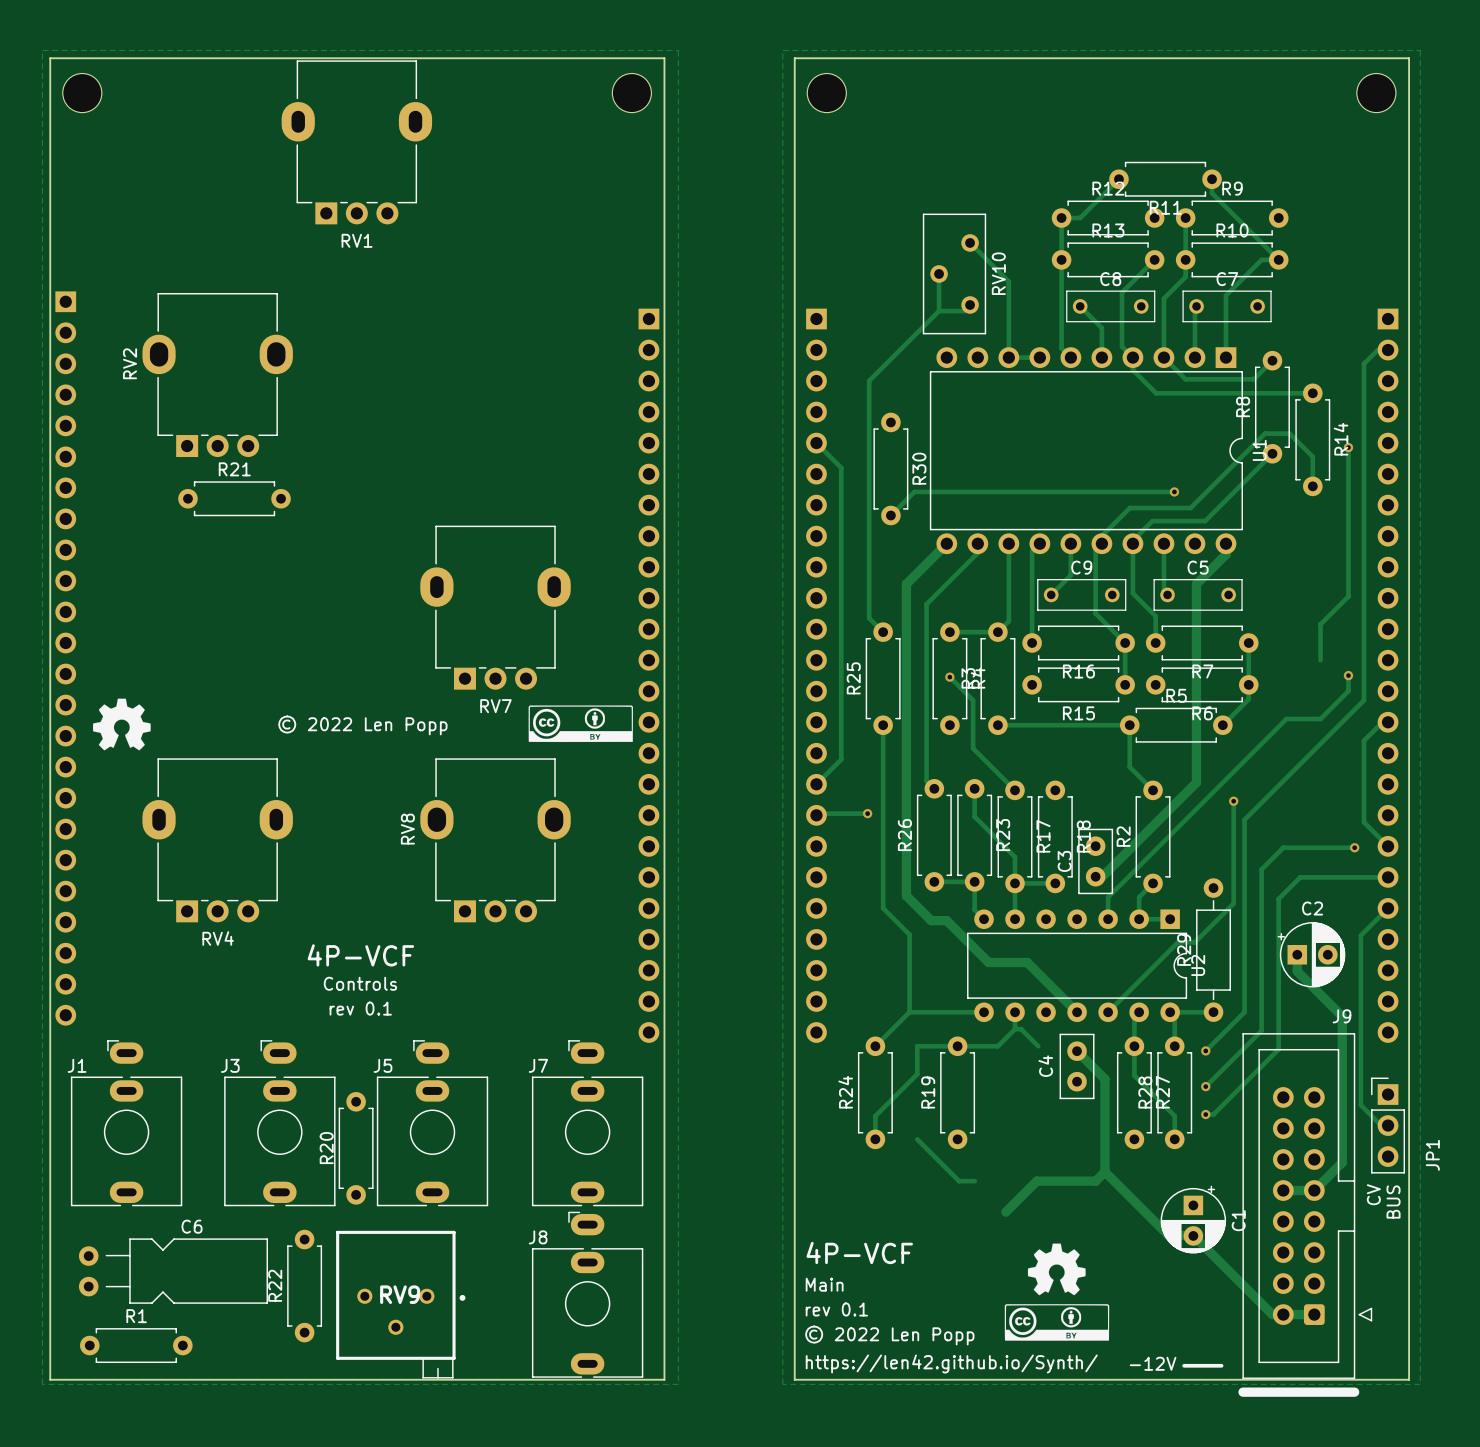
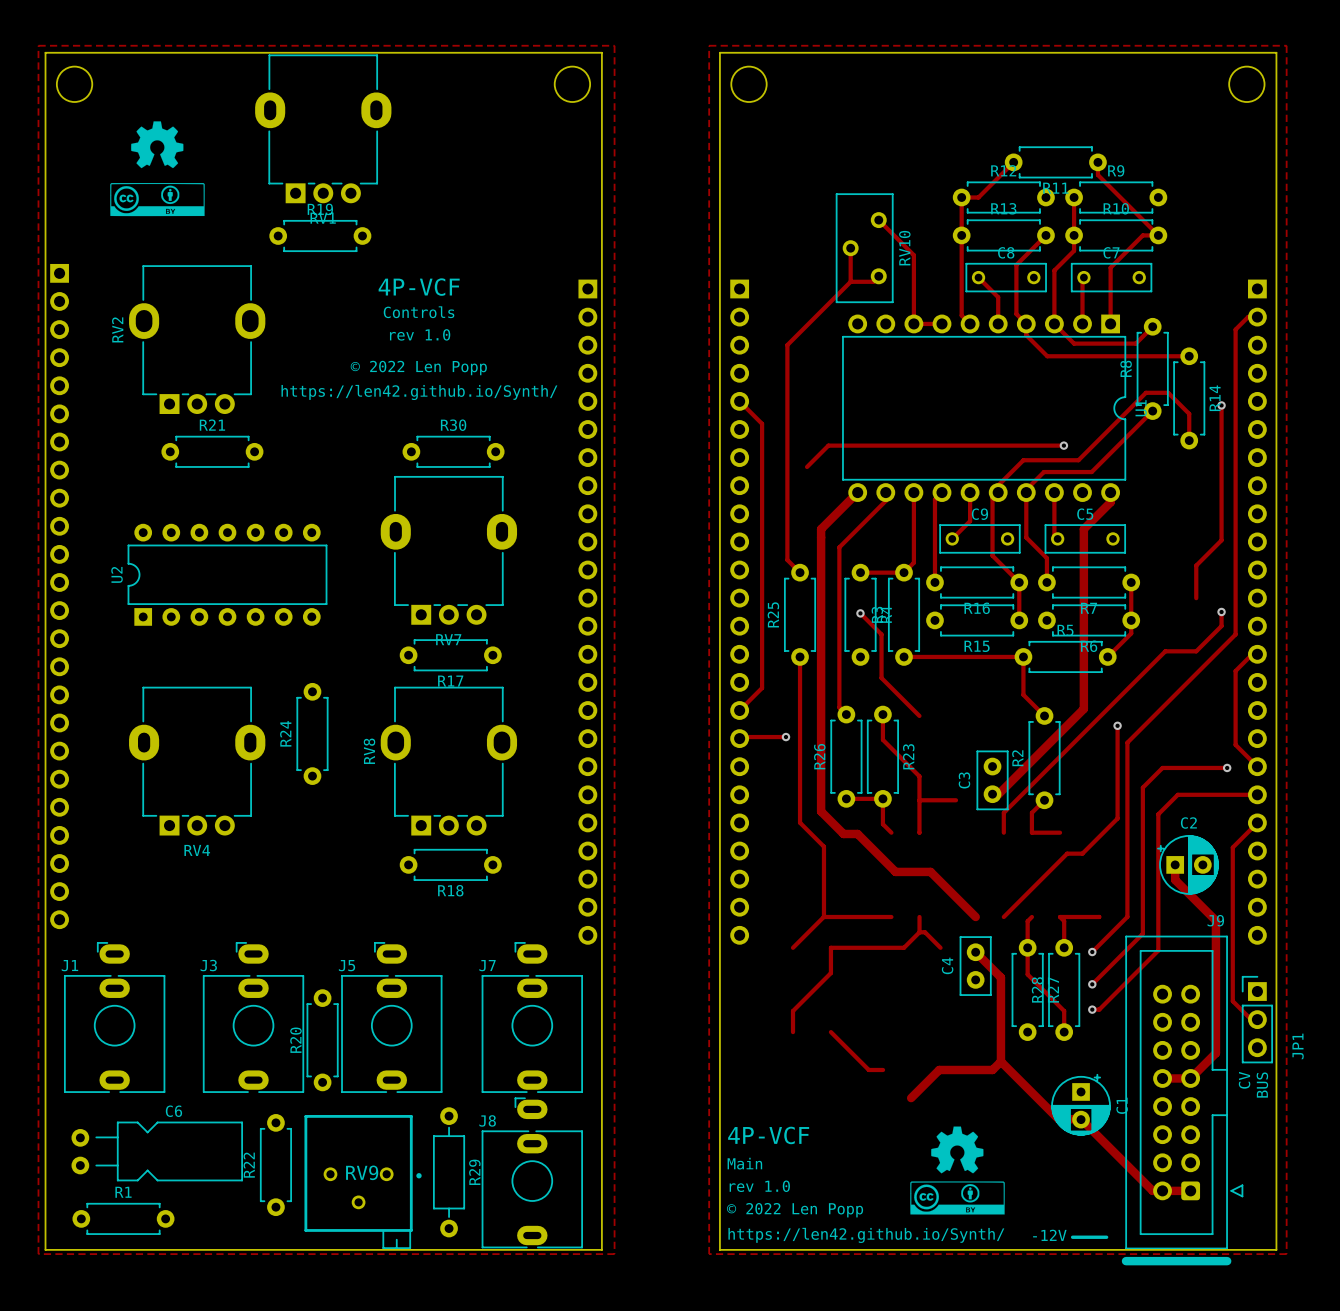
drawing: none -> [131, 121, 184, 169]
drawing: none -> [110, 183, 205, 217]
text: none -> 4P-VCF (419, 287)
text: none -> Controls (419, 312)
text: none -> rev 1.0 (420, 334)
text: none -> © 2022 Len Popp (418, 368)
text: none -> https://len42.github.io/Synth/ (419, 392)
R30 rotation: 0° (890, 468) -> 90° clockwise (453, 451)
R30 position: (890, 468) -> (453, 451)
R30 name position: R30 (919, 468) -> R30 (453, 425)
drawing: [92, 698, 151, 751] -> none
drawing: [528, 705, 633, 743] -> none
text: © 2022 Len Popp (362, 725) -> none
R17 rotation: 0° (1014, 836) -> 90° clockwise (450, 655)
R17 position: (1014, 836) -> (450, 655)
R18 rotation: 0° (1055, 836) -> 90° clockwise (450, 864)
R18 position: (1055, 836) -> (450, 864)
R29 name position: R29 (1184, 949) -> R29 (474, 1172)
R29 position: (1213, 950) -> (449, 1172)
text: 4P-VCF (360, 955) -> none
U2 rotation: 0° (1077, 965) -> 180° (227, 574)
U2 position: (1077, 965) -> (227, 574)
text: Controls (360, 983) -> none
text: rev 0.1 (360, 1008) -> none
R24 position: (875, 1092) -> (312, 733)
R19 rotation: 0° (957, 1092) -> 90° clockwise (320, 235)
R19 position: (957, 1092) -> (320, 235)
text: rev 0.1 (836, 1309) -> rev 1.0 (759, 1186)

